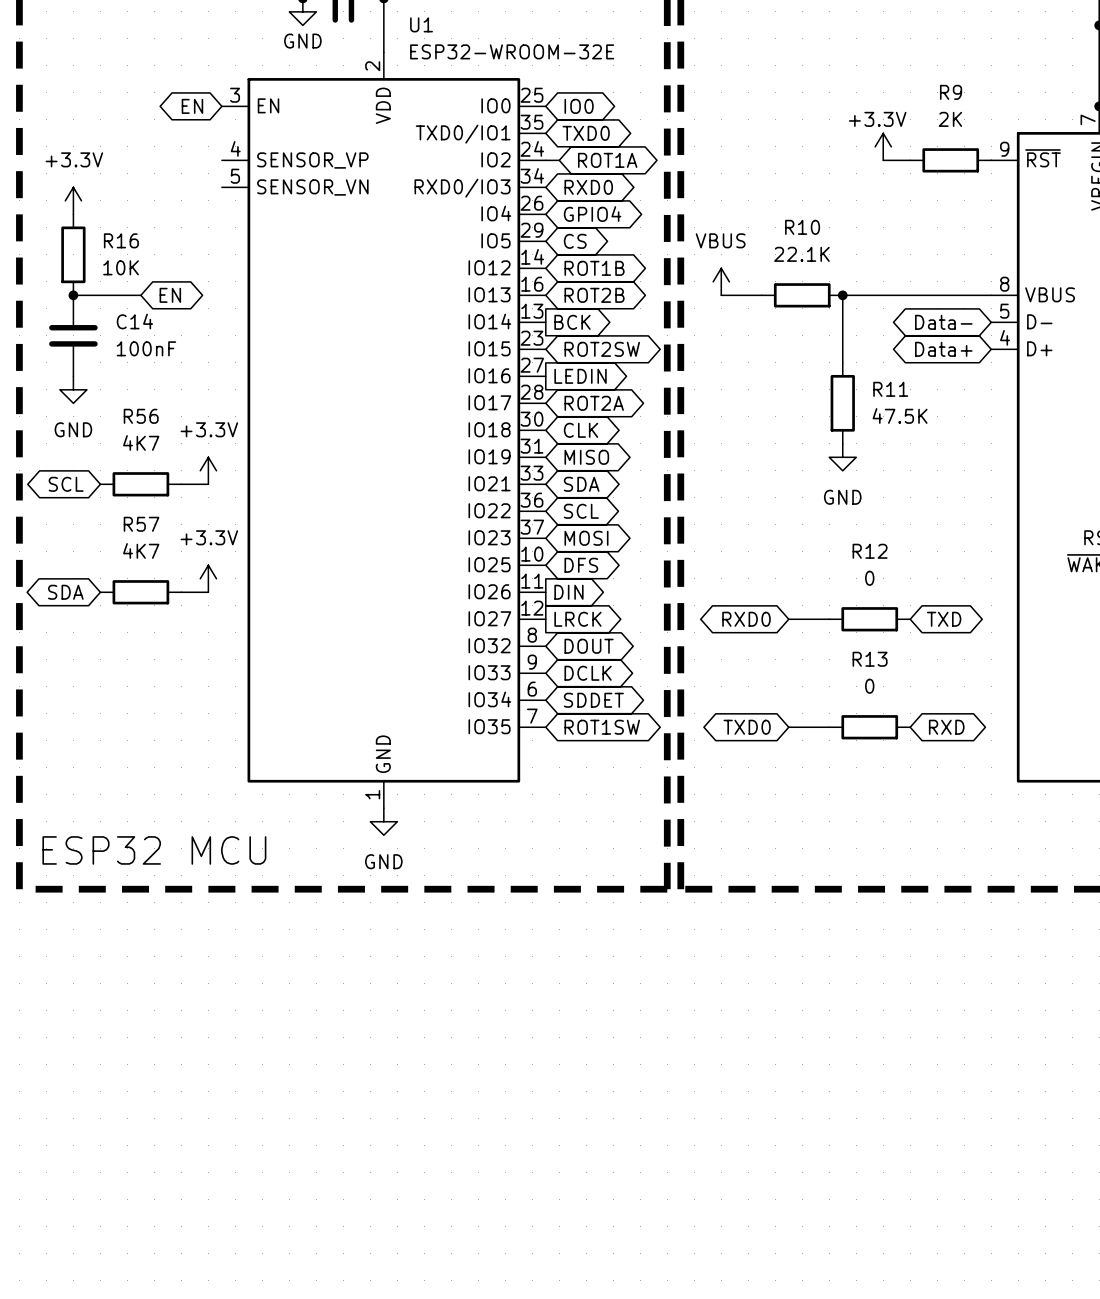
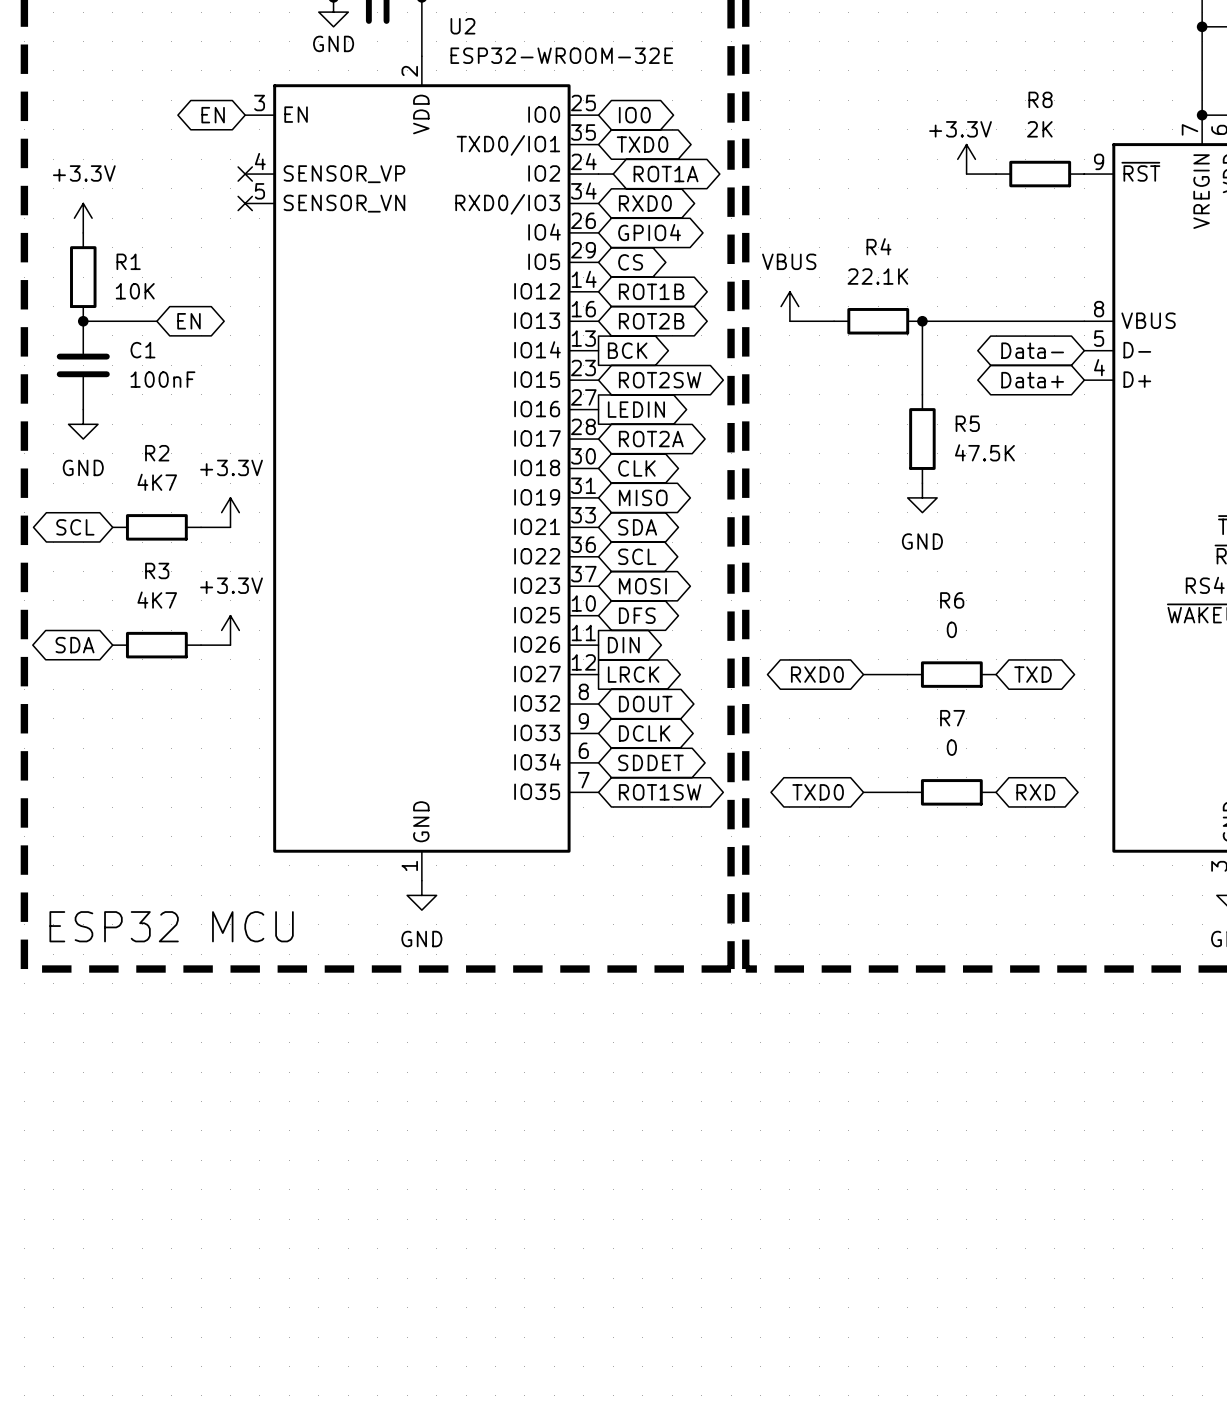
U1 name: U1 (421, 24) -> U2 (462, 26)
R9 name: R9 (951, 92) -> R8 (1040, 99)
no-connect mark: none -> (245, 174)
no-connect mark: none -> (245, 203)
R10 name: R10 (802, 227) -> R4 (878, 246)
R16 name: R16 (121, 240) -> R1 (128, 261)
C14 name: C14 (134, 321) -> C1 (142, 350)
R11 name: R11 (890, 389) -> R5 (967, 423)
R56 name: R56 (141, 416) -> R2 (157, 453)
R57 name: R57 (141, 524) -> R3 (157, 570)
R12 name: R12 (870, 551) -> R6 (952, 600)
R13 name: R13 (870, 659) -> R7 (952, 718)

